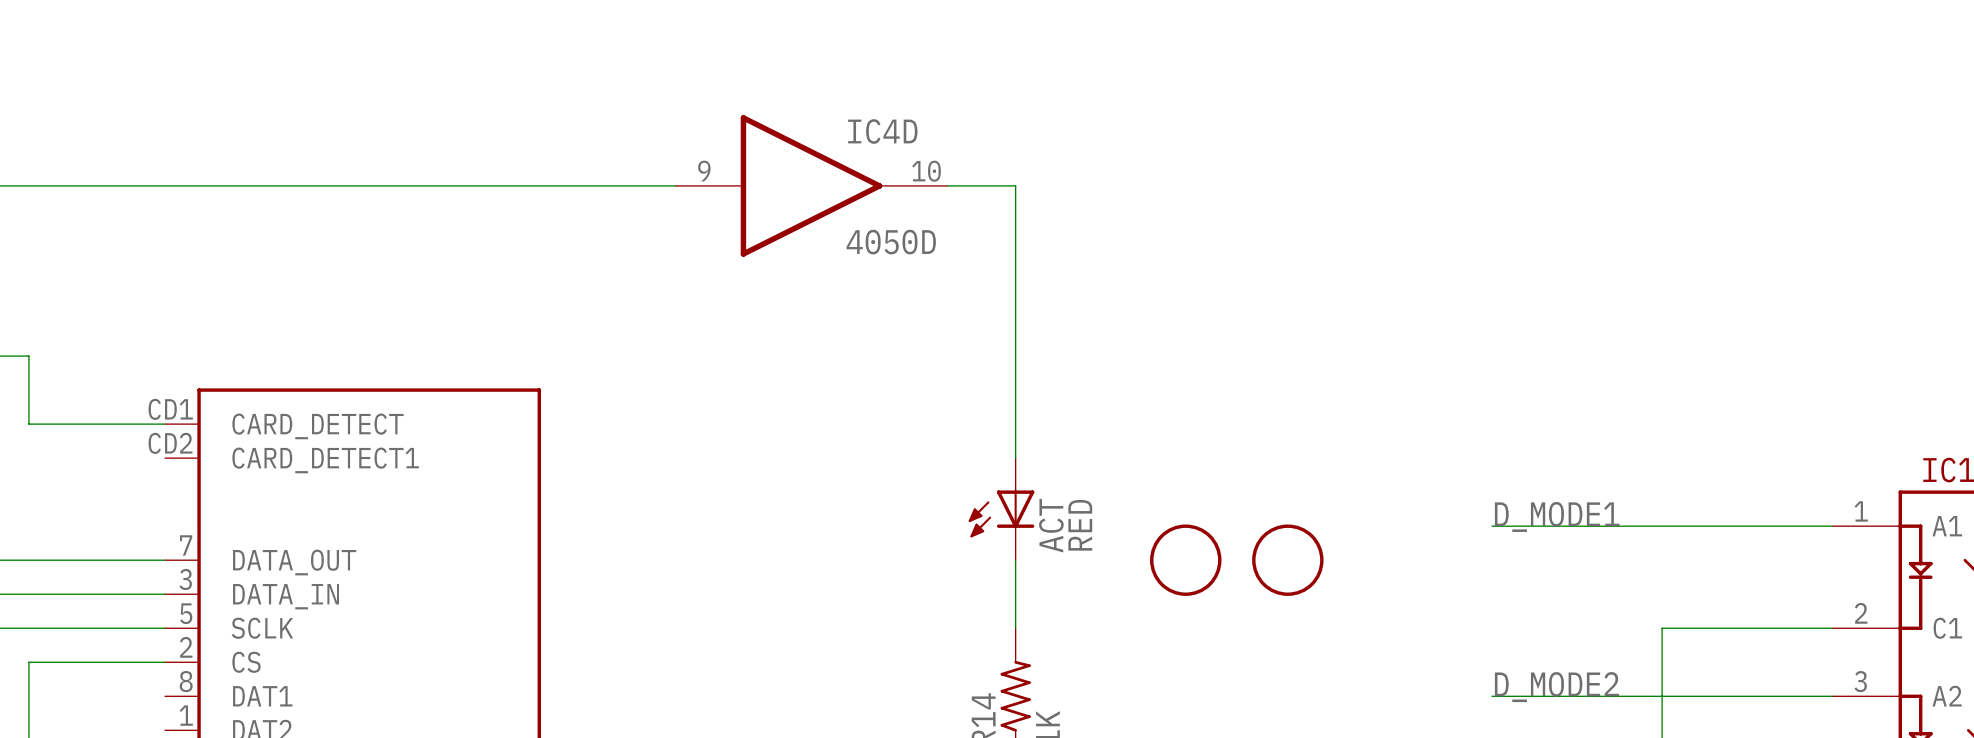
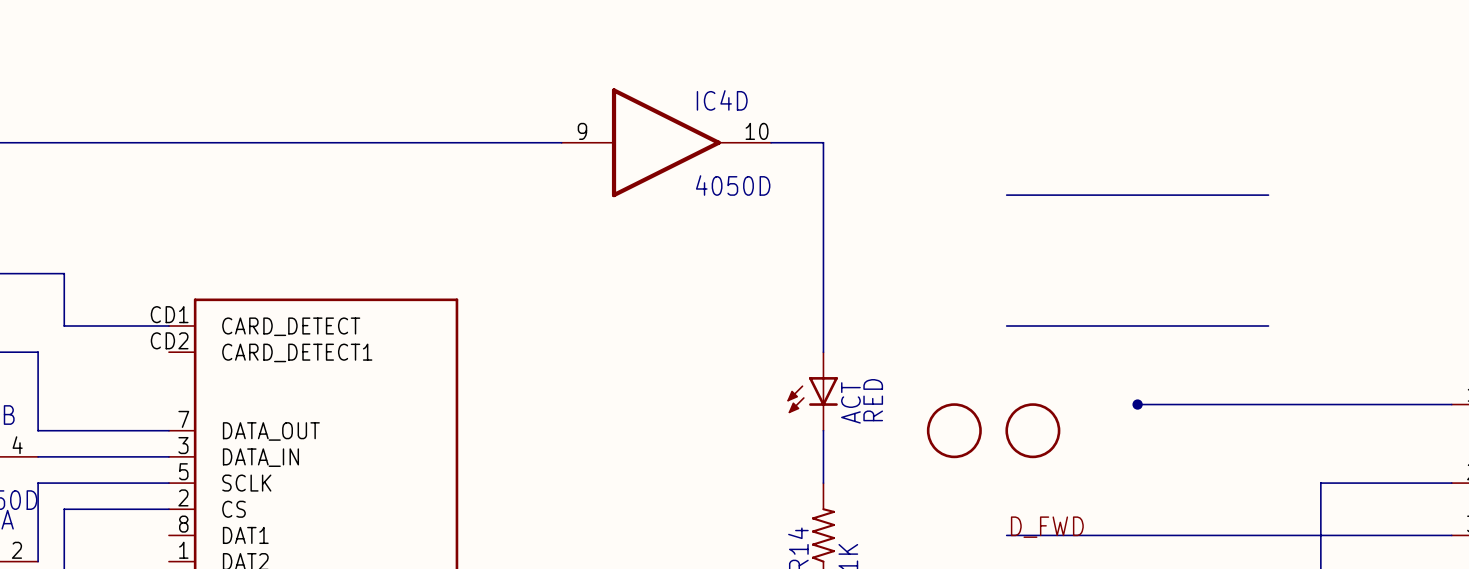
wire: none -> (1006, 195) (1268, 195)
wire: none -> (1006, 326) (1268, 326)
label: D_MODE1 (1557, 516) -> none
wire: none -> (1137, 404) (1189, 404)
junction: none -> (1137, 404)
label: none -> D_FWD (1047, 527)
label: D_MODE2 (1556, 687) -> none
wire: none -> (1006, 535) (1189, 535)

